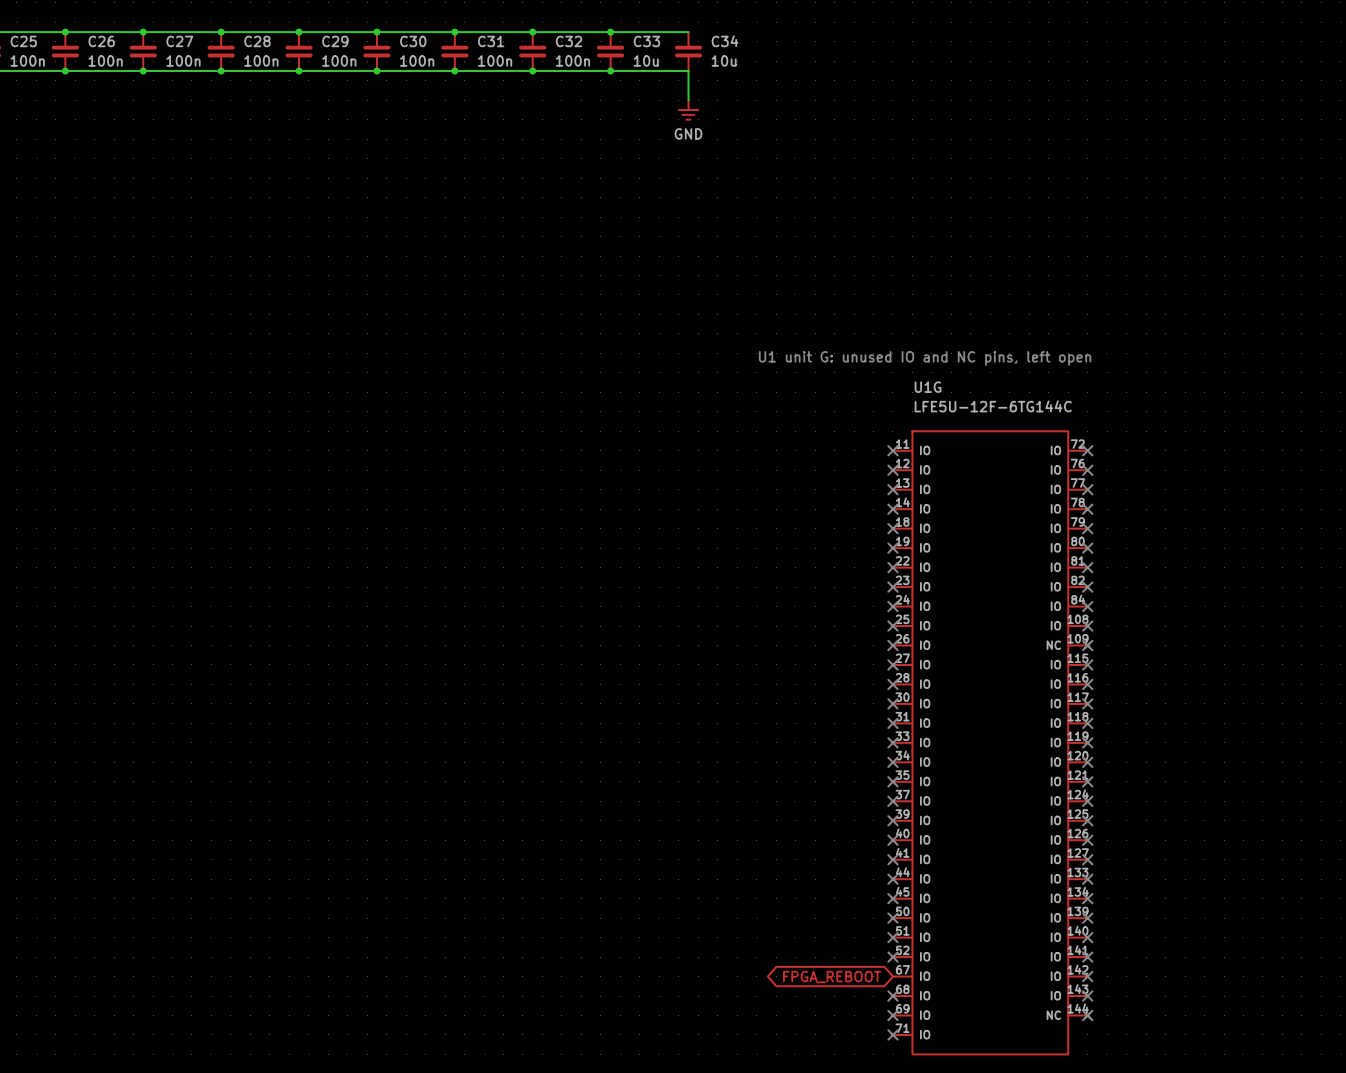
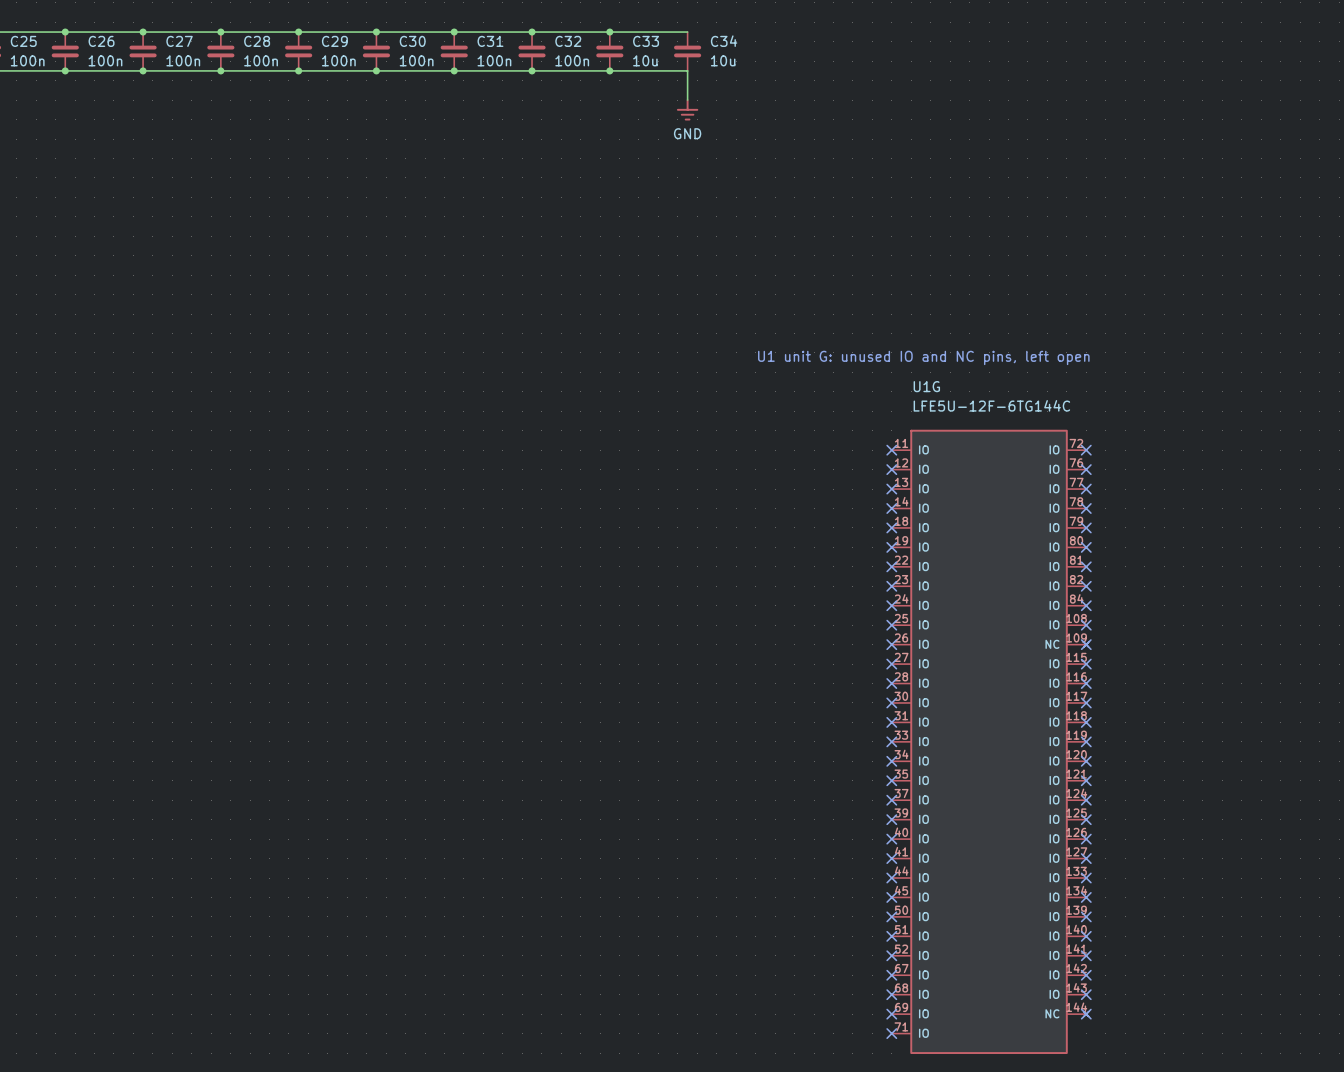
no-connect mark: none -> (891, 975)
global label: FPGA_REBOOT (832, 977) -> none

